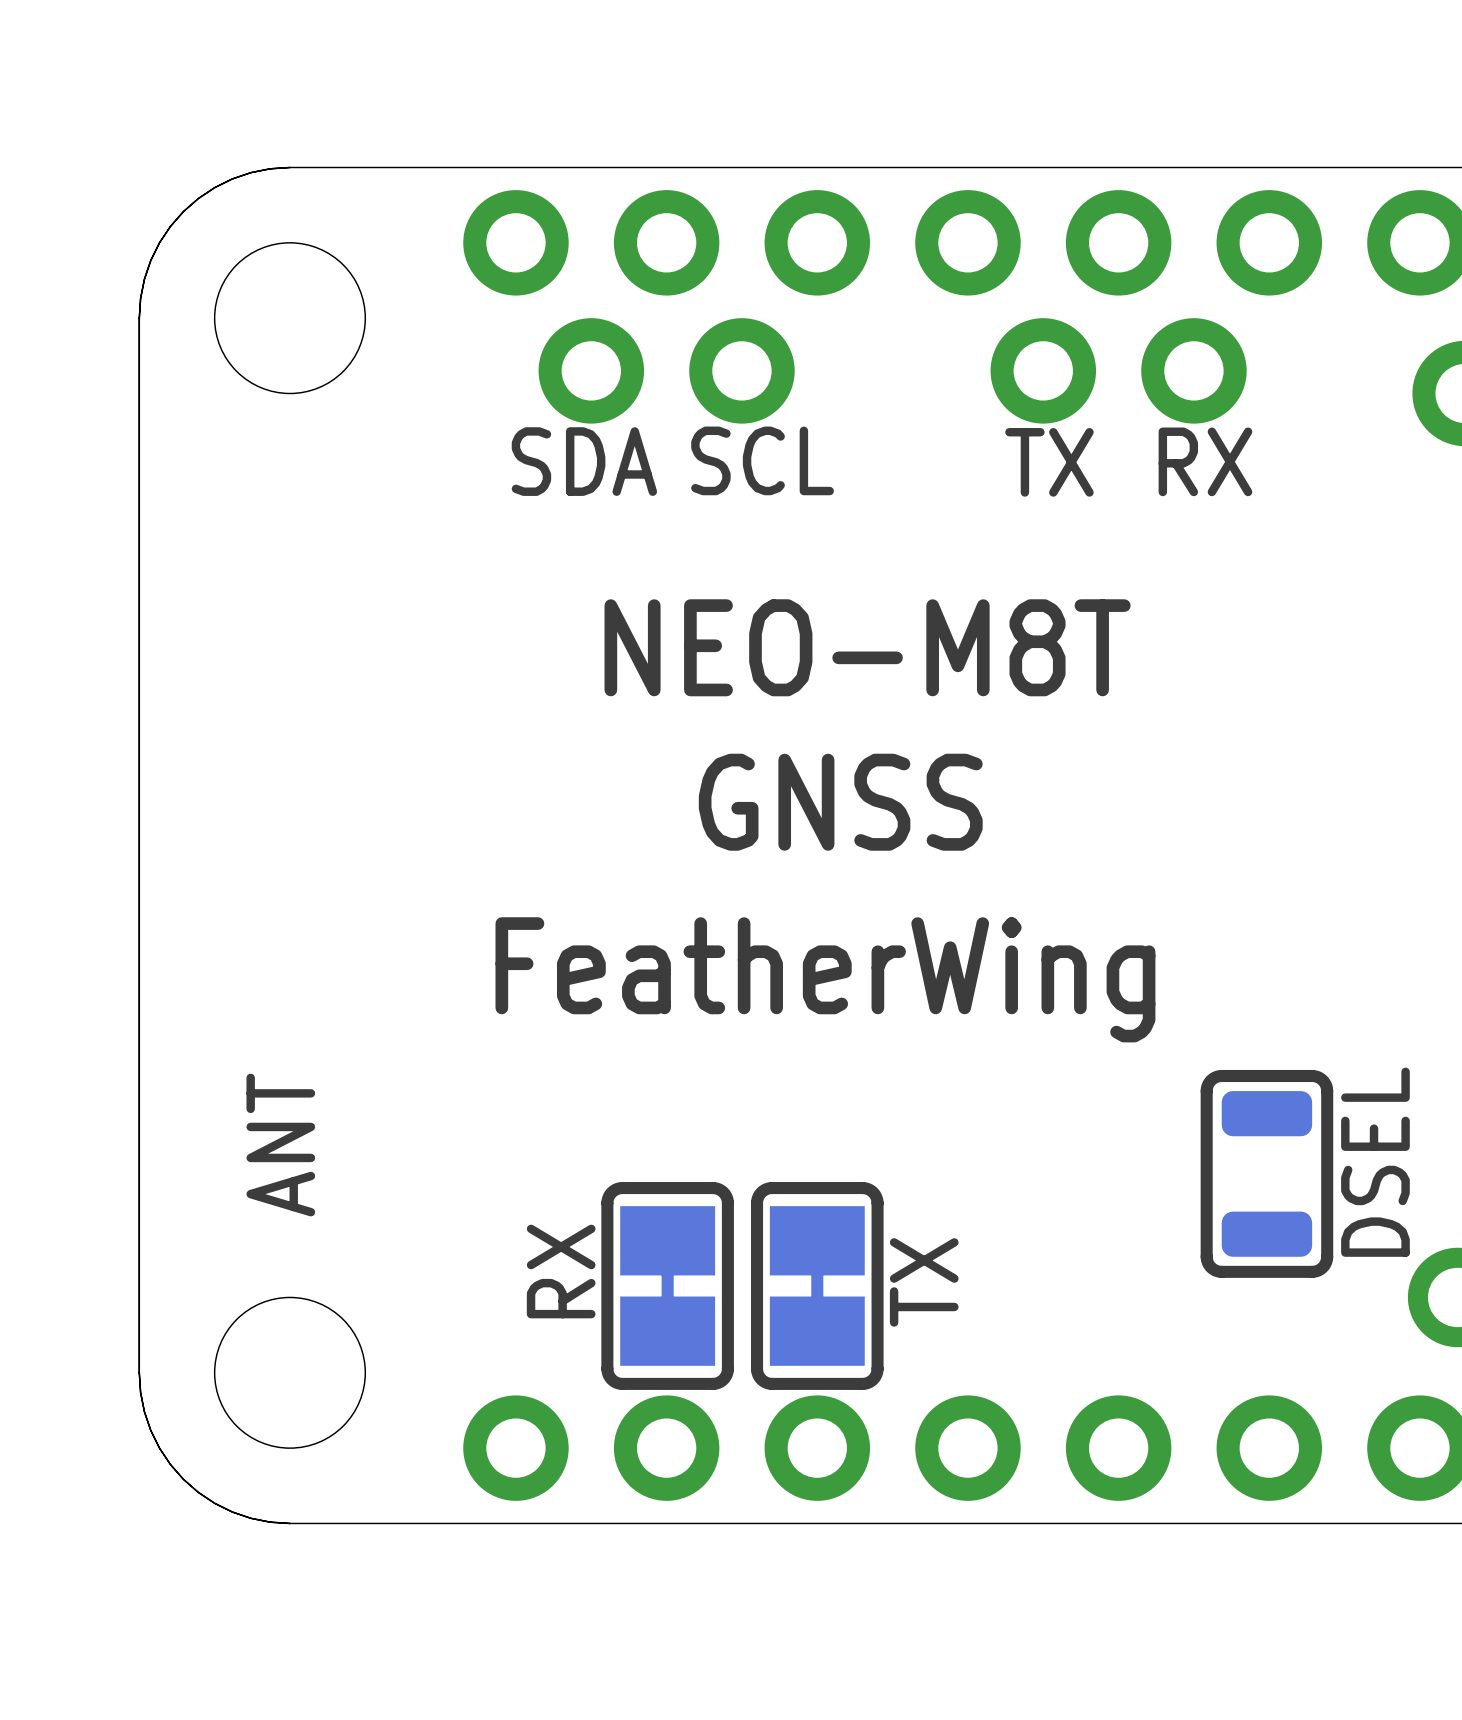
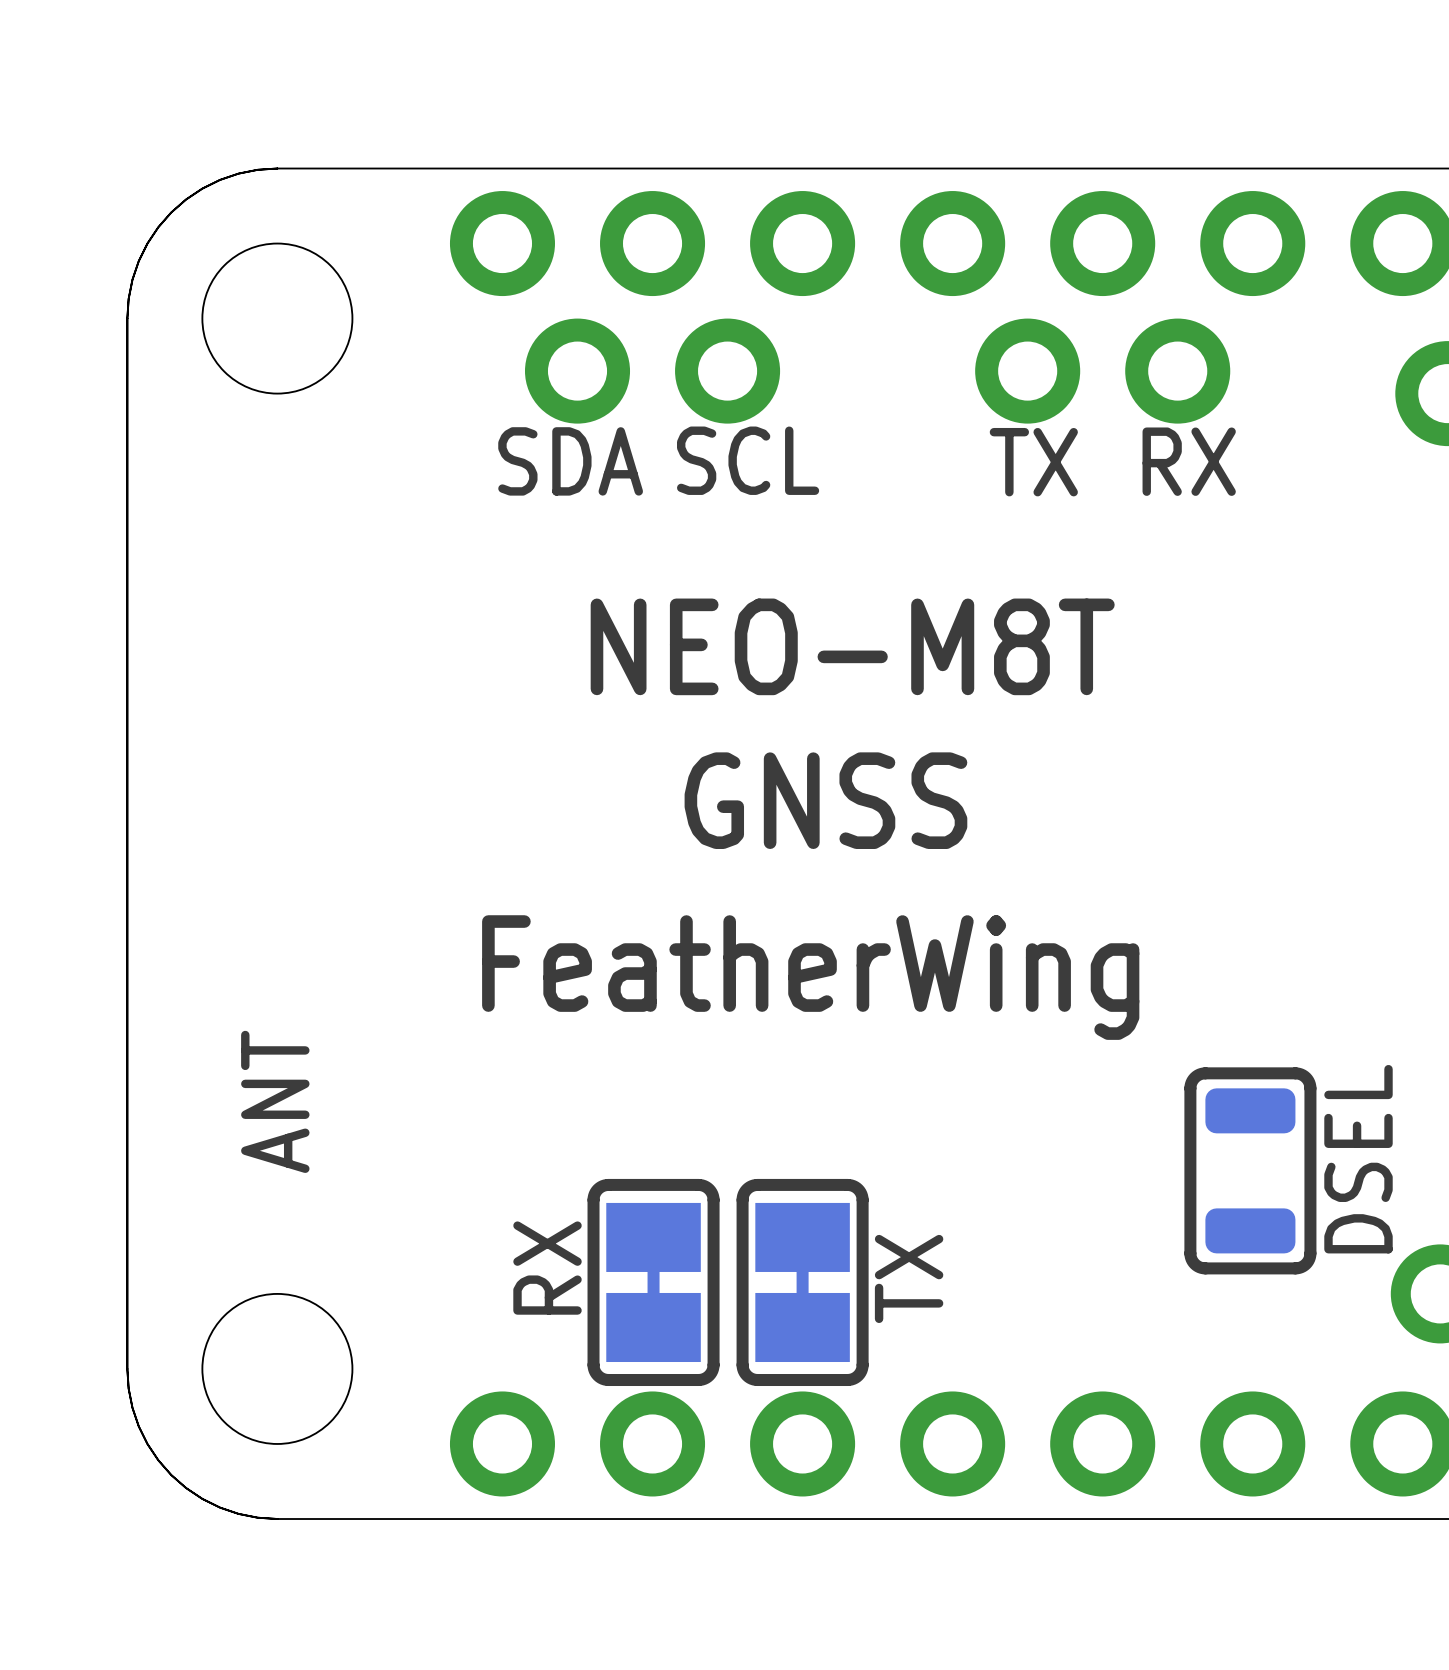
text position: ANT (280, 1145) -> ANT (275, 1101)

